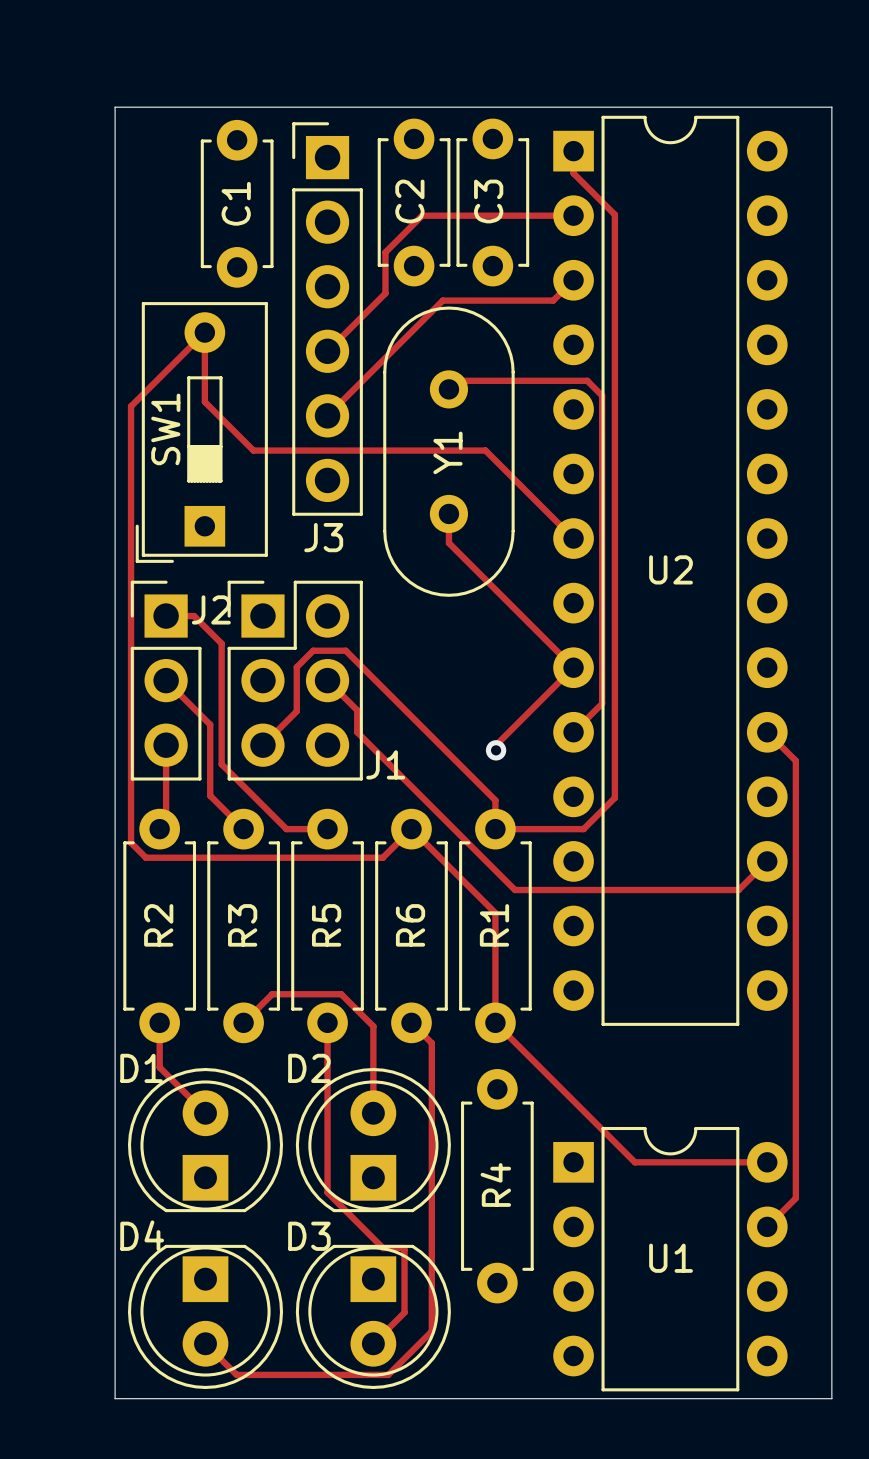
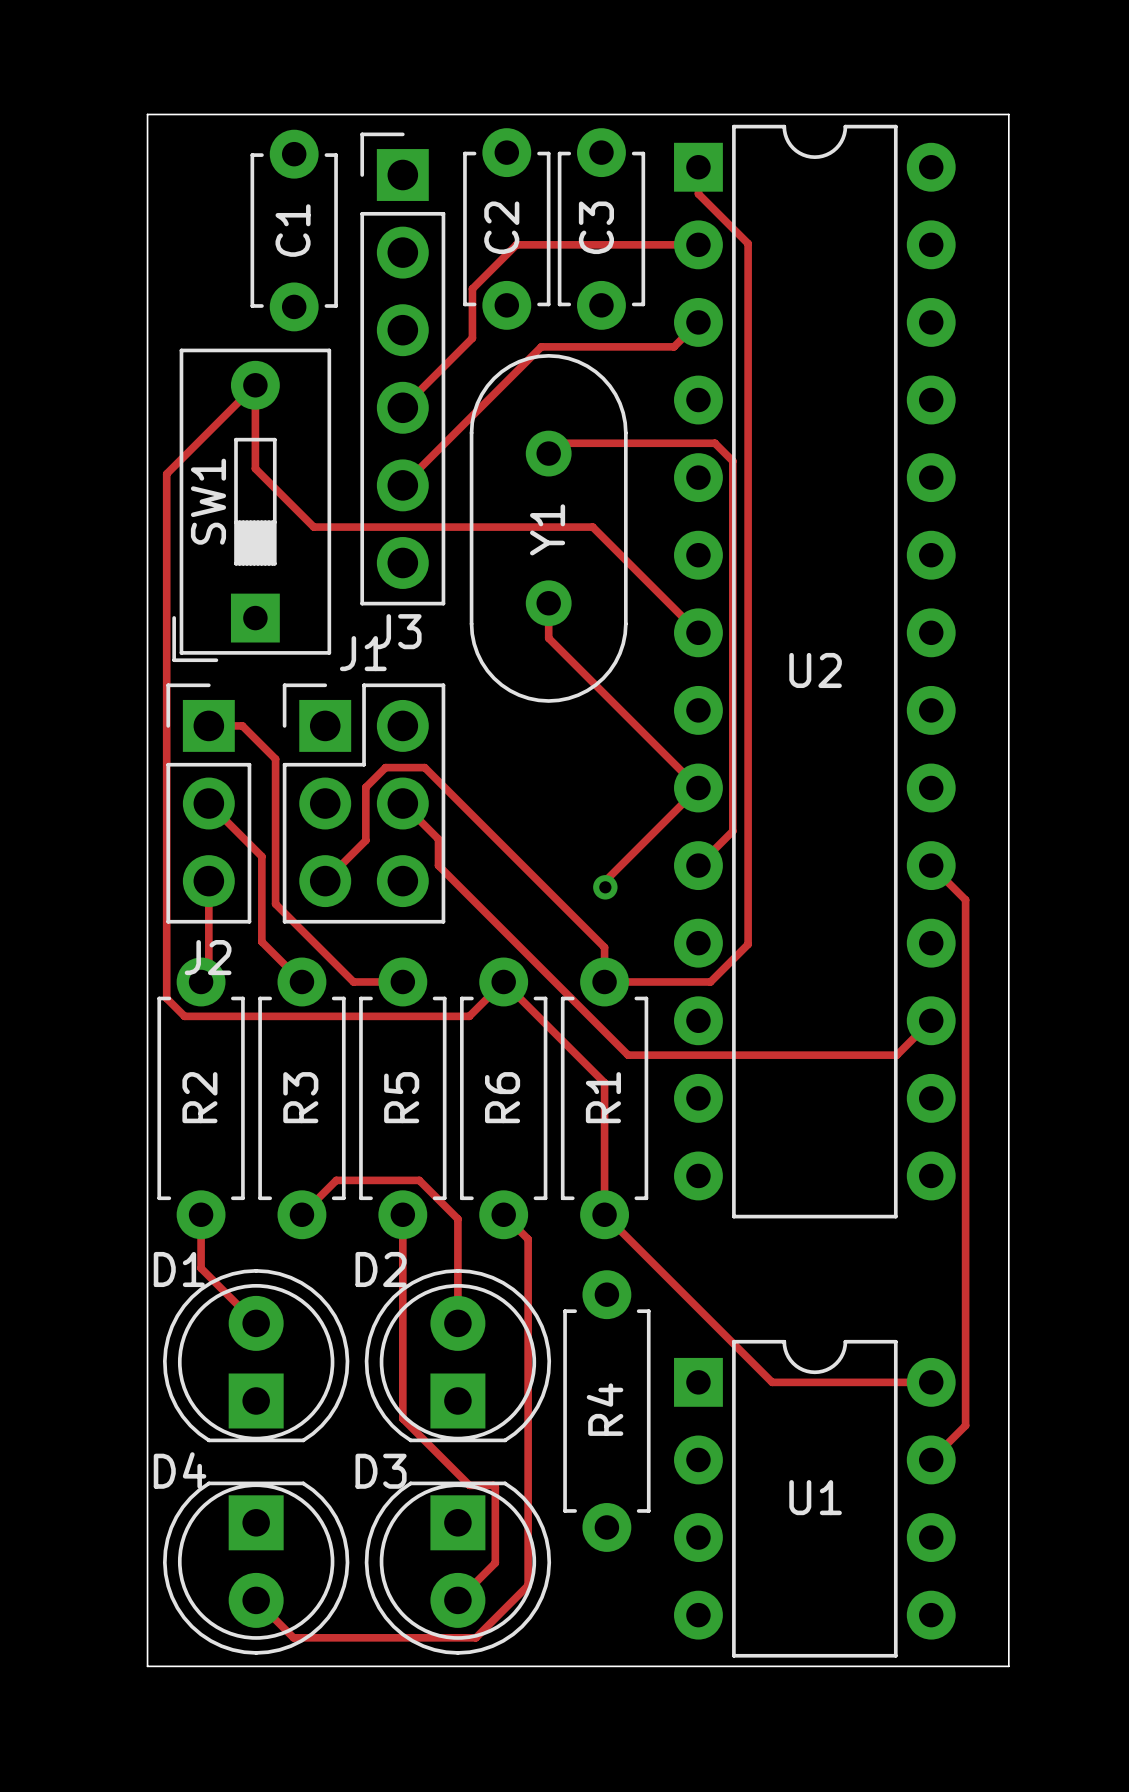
J2 name position: J2 (211, 609) -> J2 (208, 957)
J1 name position: J1 (385, 764) -> J1 (363, 653)

